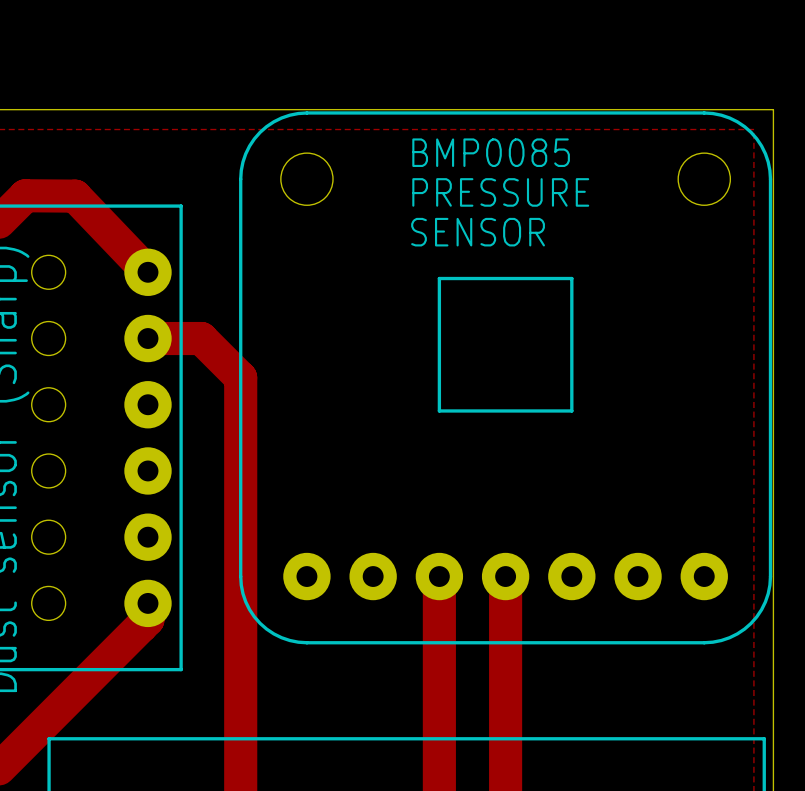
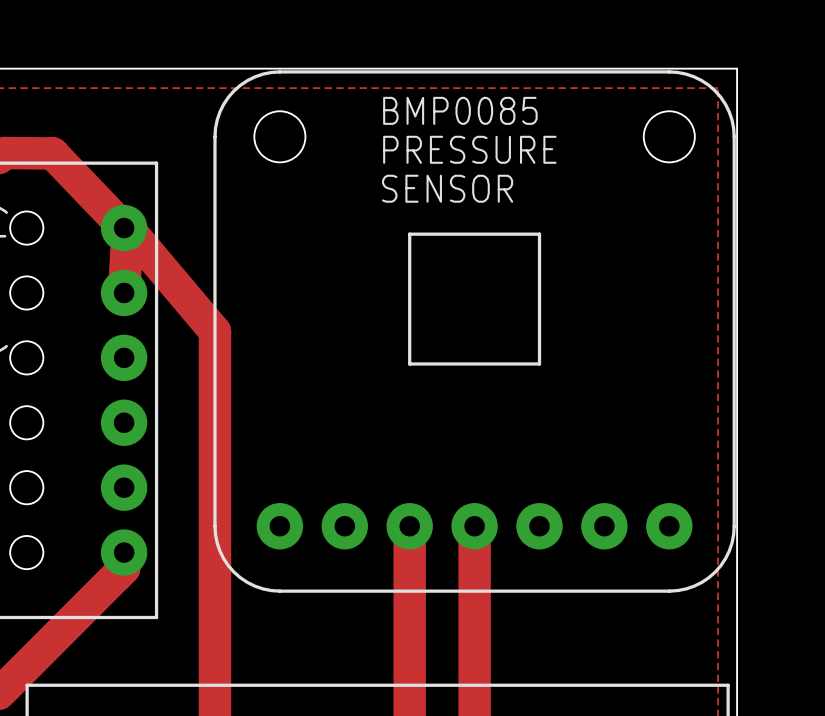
track: (148, 338) (201, 338) (240, 377) -> (124, 292) (127, 228) (214, 331)

